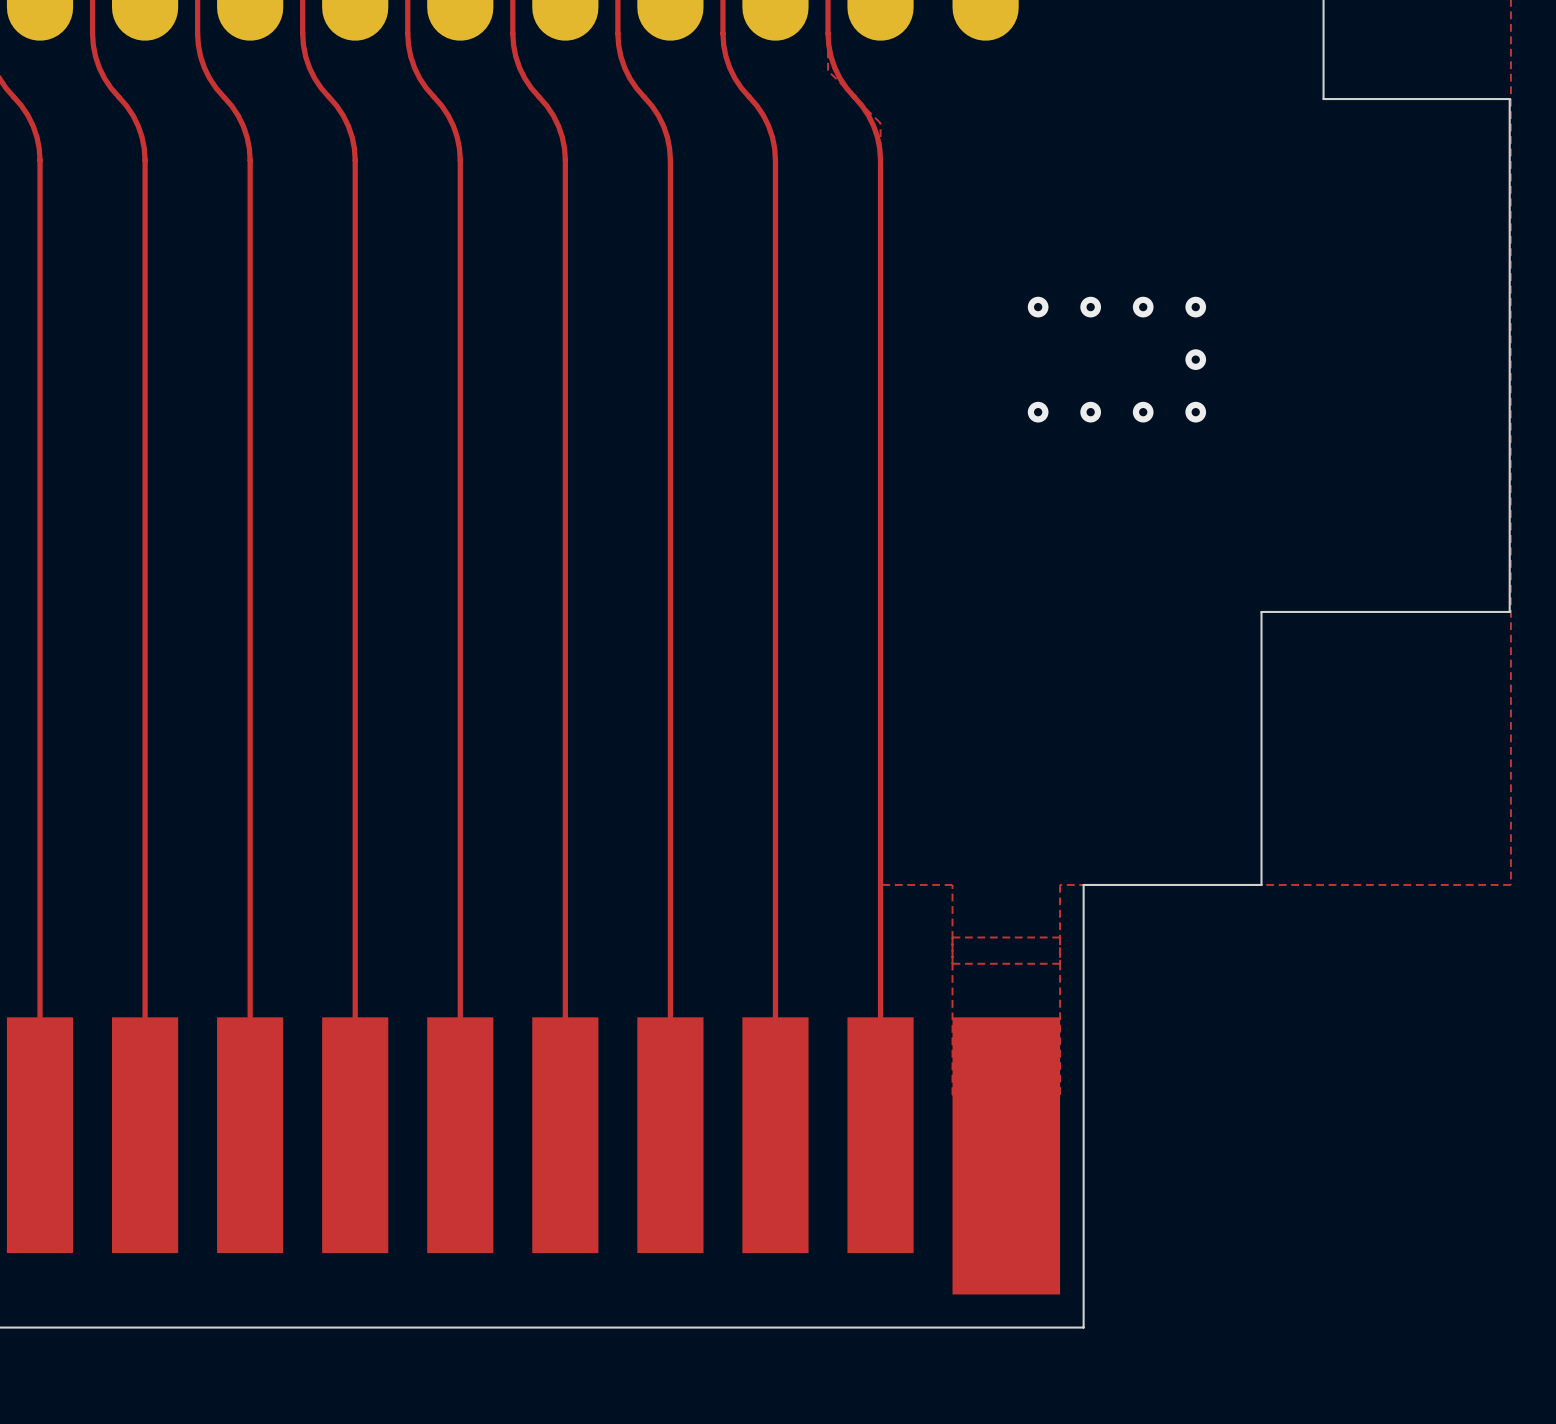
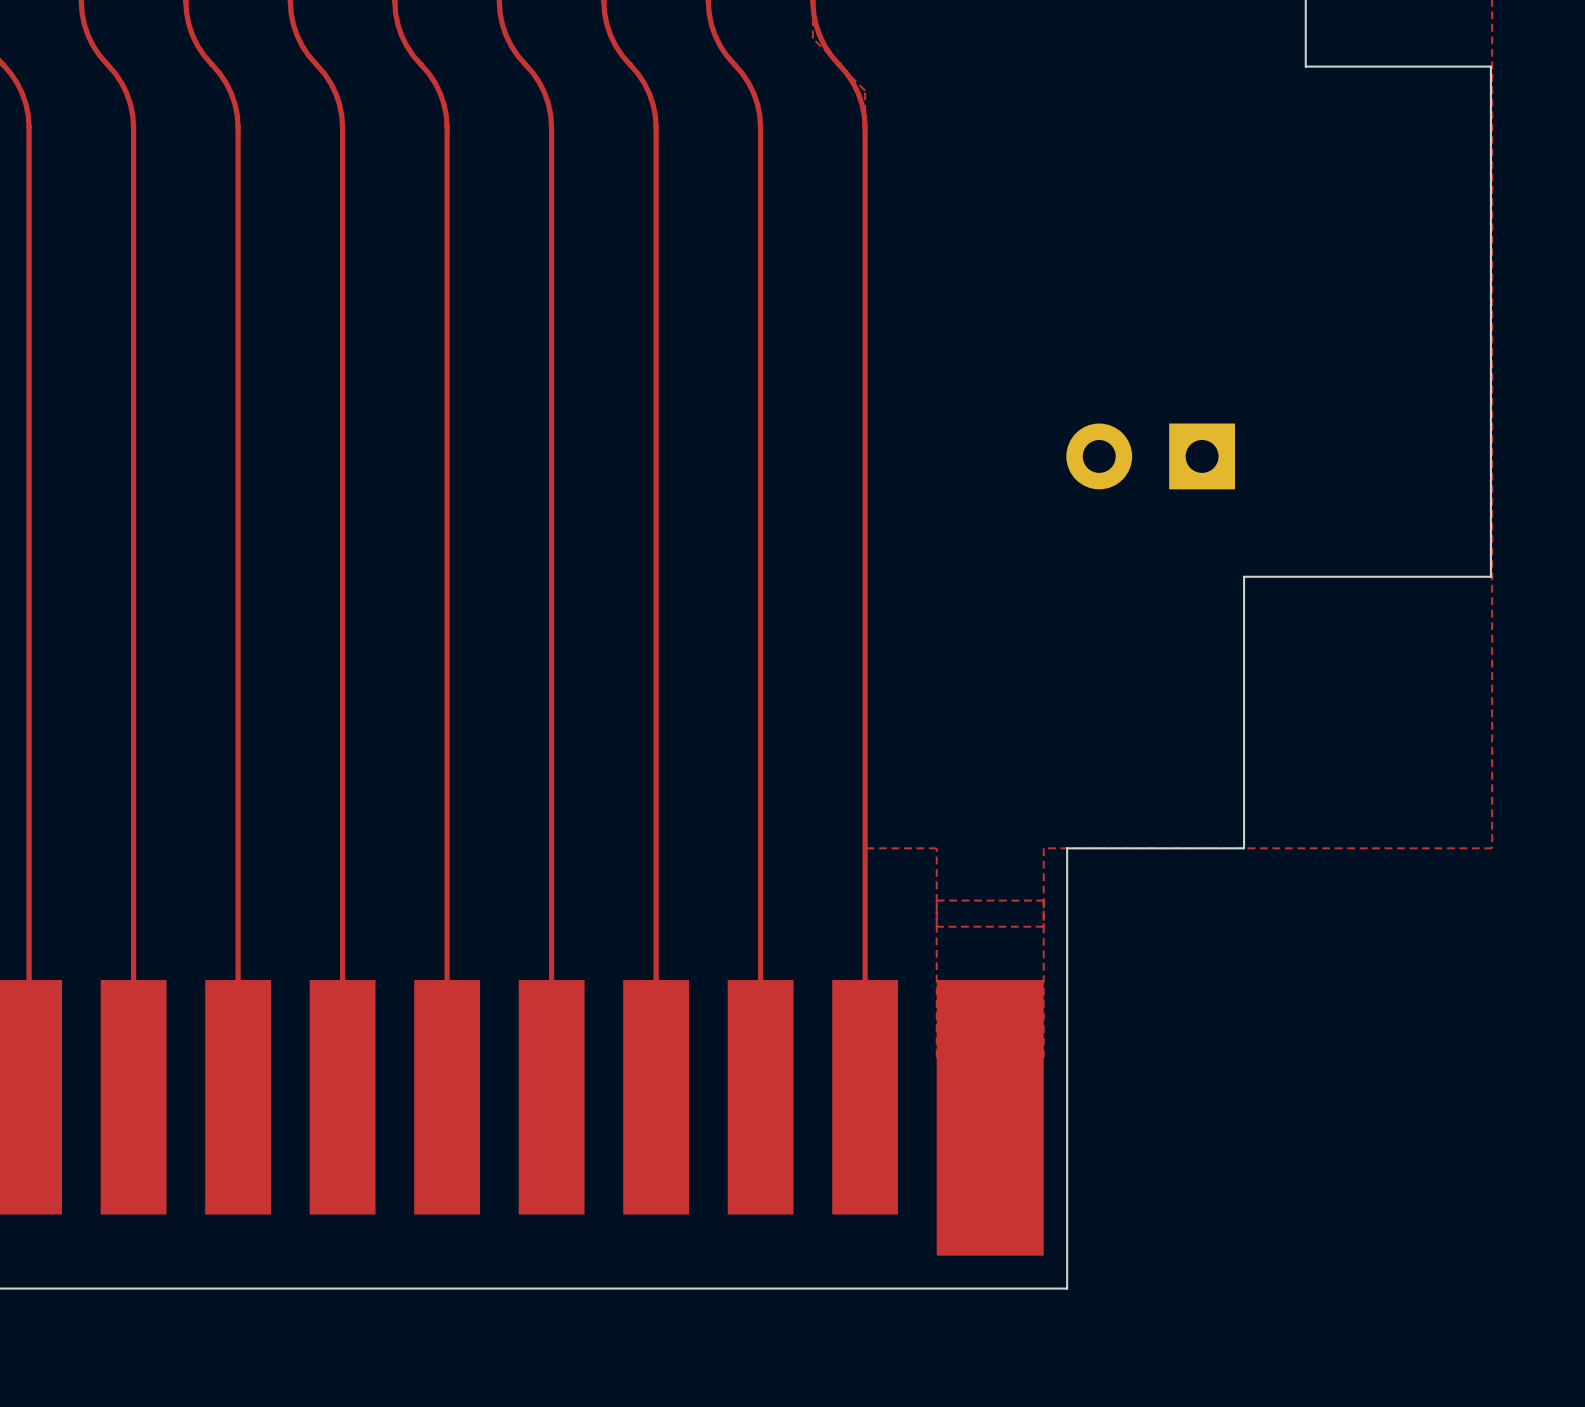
via: (1038, 307) -> none
via: (1090, 307) -> none
via: (1143, 307) -> none
via: (1195, 307) -> none
via: (1195, 359) -> none
via: (1038, 412) -> none
via: (1090, 412) -> none
via: (1143, 412) -> none
via: (1195, 412) -> none
part: none -> (1150, 456)

